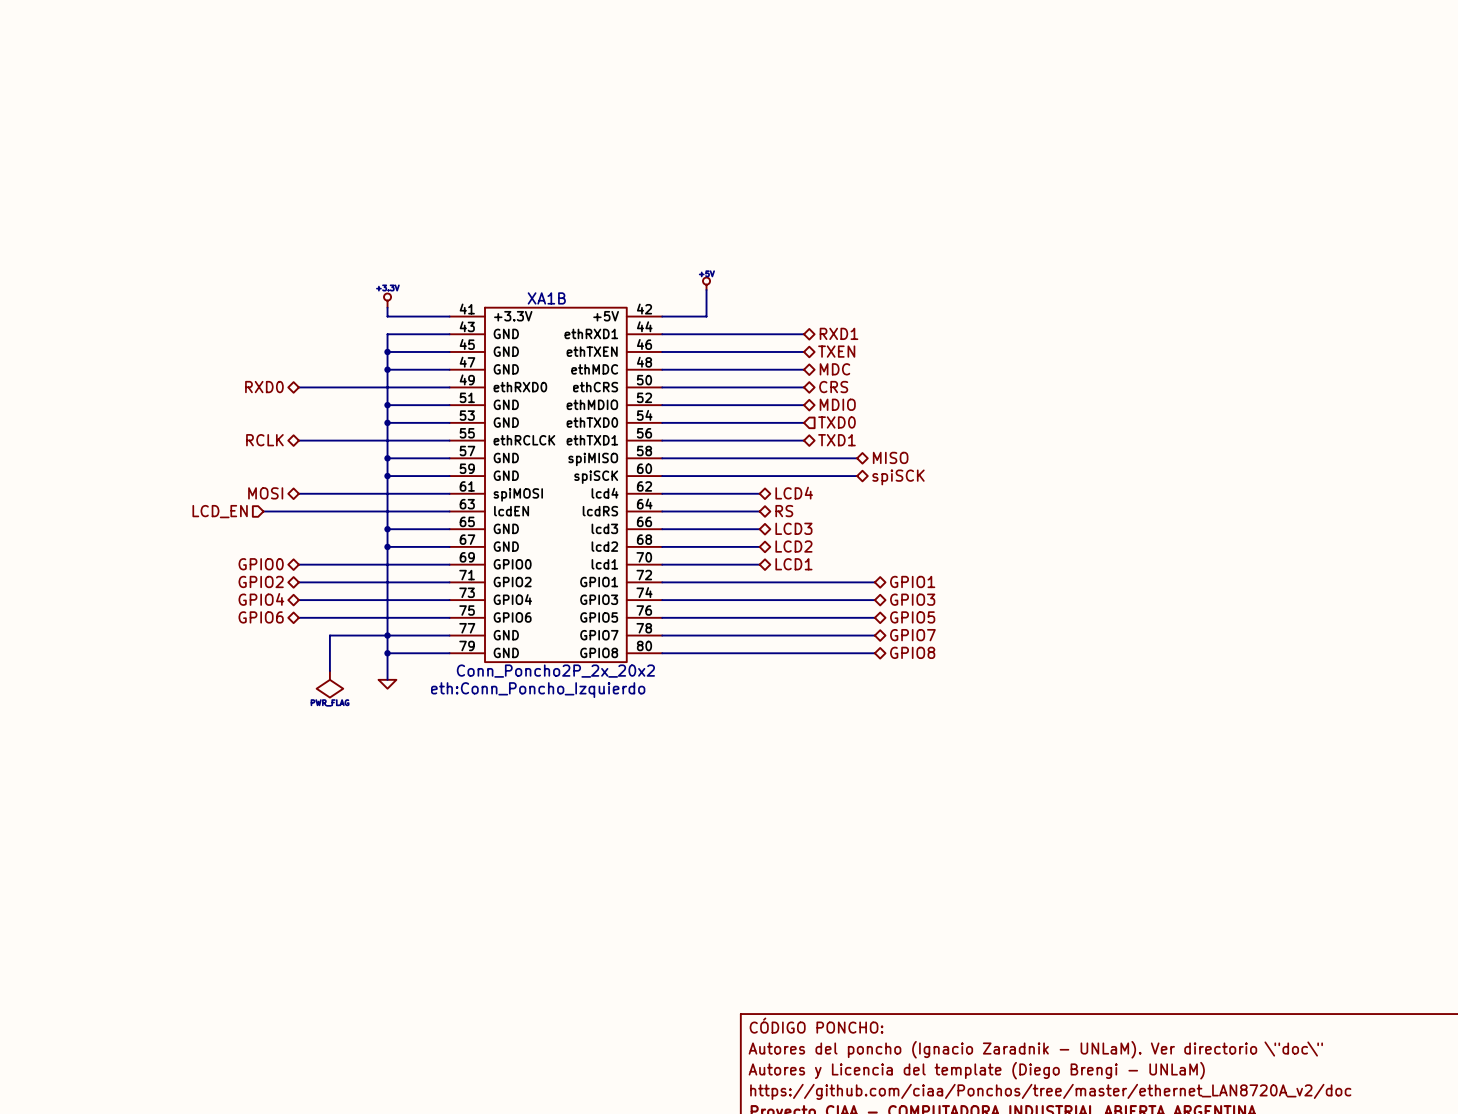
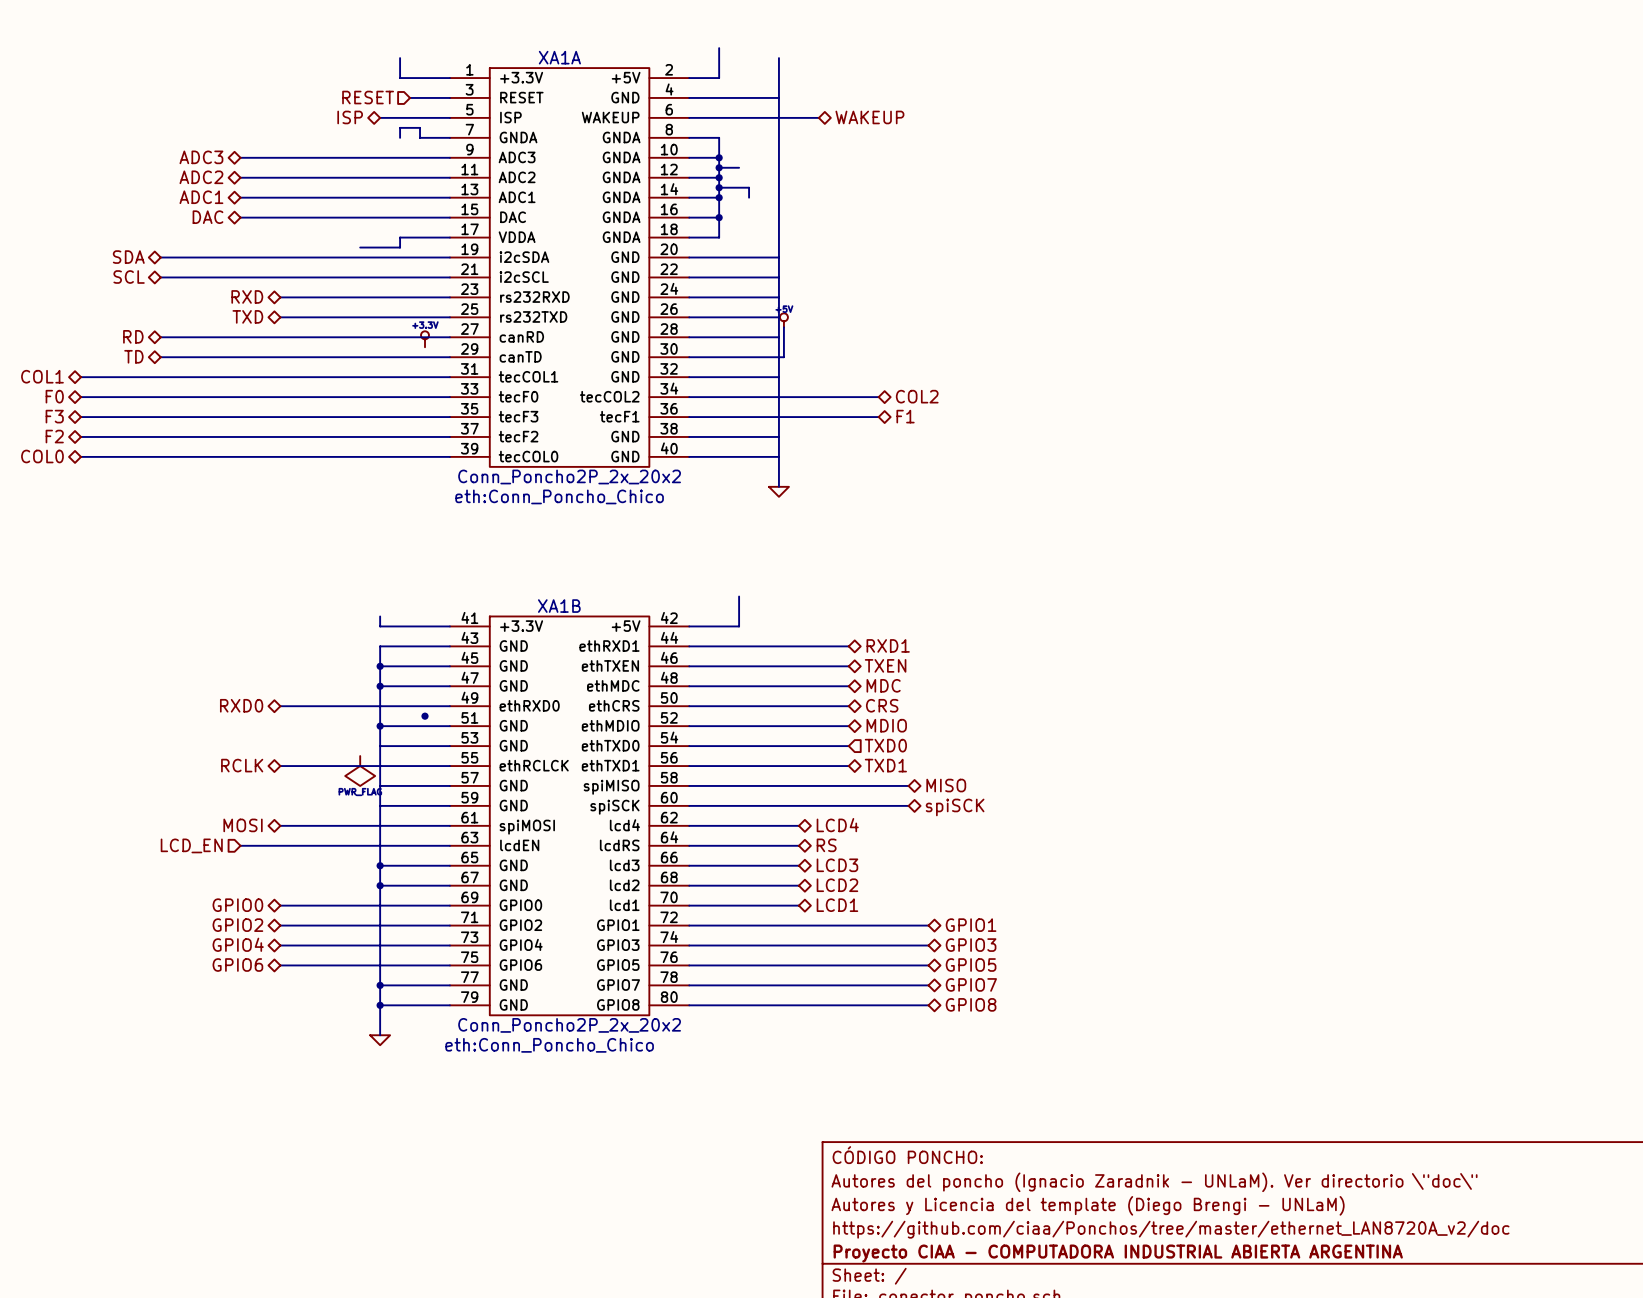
wire: none -> (719, 48) (719, 78) (689, 78)
wire: none -> (400, 58) (400, 78) (449, 78)
wire: none -> (778, 58) (778, 486)
hierarchical label: none -> RESET (368, 97)
wire: none -> (410, 97) (449, 97)
wire: none -> (689, 97) (778, 97)
hierarchical label: none -> ISP (350, 117)
wire: none -> (380, 117) (449, 117)
wire: none -> (689, 117) (818, 117)
hierarchical label: none -> WAKEUP (869, 117)
wire: none -> (400, 137) (400, 127) (420, 127) (420, 137) (449, 137)
wire: none -> (689, 137) (719, 137) (719, 237) (689, 237)
hierarchical label: none -> ADC3 (201, 157)
wire: none -> (240, 157) (449, 157)
wire: none -> (689, 157) (719, 157)
junction: none -> (719, 157)
wire: none -> (719, 167) (739, 167)
junction: none -> (719, 167)
hierarchical label: none -> ADC2 (201, 177)
wire: none -> (240, 177) (449, 177)
wire: none -> (689, 177) (719, 177)
junction: none -> (719, 177)
wire: none -> (719, 187) (749, 187) (749, 197)
junction: none -> (719, 187)
hierarchical label: none -> ADC1 (201, 197)
wire: none -> (240, 197) (449, 197)
wire: none -> (689, 197) (719, 197)
junction: none -> (719, 197)
hierarchical label: none -> DAC (207, 217)
wire: none -> (240, 217) (449, 217)
wire: none -> (689, 217) (719, 217)
junction: none -> (719, 217)
wire: none -> (449, 237) (400, 237) (400, 247) (360, 247)
hierarchical label: none -> SDA (128, 257)
wire: none -> (160, 257) (449, 257)
wire: none -> (689, 257) (778, 257)
XA1A: none -> Conn_Poncho2P_2x_20x2 (569, 267)
hierarchical label: none -> SCL (129, 277)
wire: none -> (160, 277) (449, 277)
wire: none -> (689, 277) (778, 277)
hierarchical label: none -> RXD (247, 296)
wire: none -> (280, 297) (449, 297)
wire: none -> (689, 297) (778, 297)
hierarchical label: none -> TXD (247, 316)
wire: none -> (689, 317) (778, 317)
hierarchical label: none -> RD (133, 336)
wire: none -> (160, 337) (449, 337)
wire: none -> (689, 337) (778, 337)
wire: (387, 307) (387, 316) -> (160, 357) (425, 357)
hierarchical label: none -> TD (133, 356)
hierarchical label: none -> COL1 (42, 376)
hierarchical label: RXD1 (838, 333) -> none
wire: (387, 334) (387, 679) -> (425, 377) (81, 377)
wire: (702, 334) (803, 334) -> none
hierarchical label: none -> F0 (54, 396)
wire: none -> (81, 397) (425, 397)
junction: (387, 351) -> none
wire: (790, 351) (803, 351) -> none
hierarchical label: none -> COL2 (917, 396)
hierarchical label: TXEN (836, 351) -> none
hierarchical label: none -> F3 (54, 416)
wire: none -> (81, 417) (425, 417)
junction: (387, 369) -> none
wire: (790, 369) (803, 369) -> none
hierarchical label: none -> F1 (905, 416)
hierarchical label: MDC (834, 369) -> none
hierarchical label: none -> F2 (54, 436)
wire: none -> (81, 436) (325, 436)
hierarchical label: RXD0 (264, 387) -> none
wire: (702, 387) (803, 387) -> none
hierarchical label: CRS (833, 387) -> none
hierarchical label: none -> COL0 (42, 456)
hierarchical label: MDIO (837, 404) -> none
wire: none -> (81, 456) (425, 456)
junction: (387, 405) -> none
wire: (702, 405) (803, 405) -> none
wire: (387, 422) (449, 422) -> (380, 666) (449, 666)
junction: (387, 422) -> none
wire: (662, 422) (803, 422) -> (689, 666) (848, 666)
hierarchical label: TXD0 (836, 422) -> none
power symbol: none -> (778, 491)
hierarchical label: RCLK (264, 440) -> none
wire: (298, 440) (449, 440) -> (280, 317) (449, 317)
wire: (662, 440) (803, 440) -> (689, 686) (848, 686)
hierarchical label: TXD1 (836, 440) -> none
hierarchical label: MISO (890, 457) -> none
wire: (387, 458) (449, 458) -> (380, 686) (449, 686)
junction: (387, 458) -> none
wire: (662, 458) (857, 458) -> none
wire: (387, 476) (449, 476) -> (380, 726) (449, 726)
junction: (387, 476) -> none
wire: (662, 476) (857, 476) -> none
hierarchical label: spiSCK (898, 477) -> none
XA1B position: (555, 484) -> (569, 815)
hierarchical label: MOSI (265, 493) -> none
wire: (298, 493) (449, 493) -> (280, 706) (449, 706)
wire: (662, 493) (759, 493) -> none
hierarchical label: LCD4 (794, 493) -> none
hierarchical label: LCD_EN (220, 511) -> none
wire: (263, 511) (449, 511) -> none
wire: (662, 511) (759, 511) -> none
hierarchical label: RS (784, 511) -> none
hierarchical label: LCD3 (793, 528) -> none
wire: (387, 529) (449, 529) -> (380, 785) (449, 785)
junction: (387, 529) -> none
wire: (662, 529) (759, 529) -> none
wire: none -> (739, 596) (739, 626) (689, 626)
wire: none -> (380, 616) (380, 626) (449, 626)
wire: (387, 546) (449, 546) -> (380, 805) (449, 805)
junction: (387, 546) -> none
wire: (662, 546) (759, 546) -> none
hierarchical label: LCD2 (793, 546) -> none
hierarchical label: GPIO0 (261, 564) -> none
wire: (298, 564) (449, 564) -> (280, 825) (449, 825)
wire: (662, 564) (759, 564) -> (689, 825) (798, 825)
hierarchical label: LCD1 (793, 564) -> none
wire: none -> (449, 646) (380, 646) (380, 1035)
wire: none -> (689, 646) (848, 646)
hierarchical label: none -> RXD1 (888, 645)
hierarchical label: GPIO2 (261, 581) -> none
hierarchical label: GPIO1 (912, 581) -> none
wire: (298, 582) (449, 582) -> none
wire: (662, 582) (874, 582) -> none
hierarchical label: none -> TXEN (885, 665)
junction: none -> (380, 666)
hierarchical label: GPIO4 (261, 599) -> none
hierarchical label: GPIO3 (912, 599) -> none
wire: (298, 600) (449, 600) -> none
wire: (662, 600) (874, 600) -> none
junction: none -> (380, 686)
hierarchical label: none -> MDC (883, 685)
hierarchical label: GPIO6 (261, 617) -> none
wire: (298, 617) (449, 617) -> (280, 766) (449, 766)
wire: (662, 617) (874, 617) -> none
hierarchical label: GPIO5 (912, 617) -> none
hierarchical label: none -> RXD0 (241, 705)
wire: none -> (689, 706) (848, 706)
hierarchical label: none -> CRS (882, 705)
wire: (449, 635) (329, 635) (329, 670) -> none
wire: (662, 635) (874, 635) -> none
hierarchical label: GPIO7 (912, 635) -> none
junction: none -> (380, 726)
wire: none -> (689, 726) (848, 726)
hierarchical label: none -> MDIO (886, 725)
hierarchical label: GPIO8 (912, 652) -> none
wire: (387, 653) (449, 653) -> (380, 885) (449, 885)
junction: (387, 653) -> none
wire: (662, 653) (874, 653) -> (689, 925) (928, 925)
hierarchical label: none -> TXD0 (885, 745)
wire: none -> (380, 746) (449, 746)
wire: none -> (689, 746) (848, 746)
hierarchical label: none -> RCLK (242, 765)
wire: none -> (689, 766) (848, 766)
hierarchical label: none -> TXD1 (885, 765)
power symbol: (387, 684) -> none
XA1B text: eth:Conn_Poncho_Izquierdo (538, 690) -> eth:Conn_Poncho_Chico (549, 1045)
wire: none -> (689, 785) (908, 785)
hierarchical label: none -> MISO (946, 785)
wire: none -> (689, 805) (908, 805)
hierarchical label: none -> spiSCK (955, 807)
hierarchical label: none -> MOSI (243, 825)
hierarchical label: none -> LCD4 (837, 825)
hierarchical label: none -> LCD_EN (191, 845)
wire: none -> (240, 845) (449, 845)
wire: none -> (689, 845) (798, 845)
hierarchical label: none -> RS (826, 845)
wire: none -> (380, 865) (449, 865)
junction: none -> (380, 865)
wire: none -> (689, 865) (798, 865)
hierarchical label: none -> LCD3 (837, 865)
hierarchical label: none -> LCD2 (837, 885)
junction: none -> (380, 885)
wire: none -> (689, 885) (798, 885)
hierarchical label: none -> GPIO0 (237, 905)
wire: none -> (280, 905) (449, 905)
wire: none -> (689, 905) (798, 905)
hierarchical label: none -> LCD1 (837, 905)
hierarchical label: none -> GPIO2 (237, 925)
wire: none -> (280, 925) (449, 925)
hierarchical label: none -> GPIO1 (971, 925)
hierarchical label: none -> GPIO4 (238, 944)
hierarchical label: none -> GPIO3 (971, 945)
wire: none -> (280, 945) (449, 945)
wire: none -> (689, 945) (928, 945)
hierarchical label: none -> GPIO6 (237, 965)
hierarchical label: none -> GPIO5 (971, 965)
wire: none -> (280, 965) (449, 965)
wire: none -> (689, 965) (928, 965)
wire: none -> (380, 985) (449, 985)
junction: none -> (380, 985)
wire: none -> (689, 985) (928, 985)
hierarchical label: none -> GPIO7 (971, 984)
wire: none -> (380, 1005) (449, 1005)
junction: none -> (380, 1005)
wire: none -> (689, 1005) (928, 1005)
hierarchical label: none -> GPIO8 (971, 1004)
power symbol: none -> (380, 1040)

